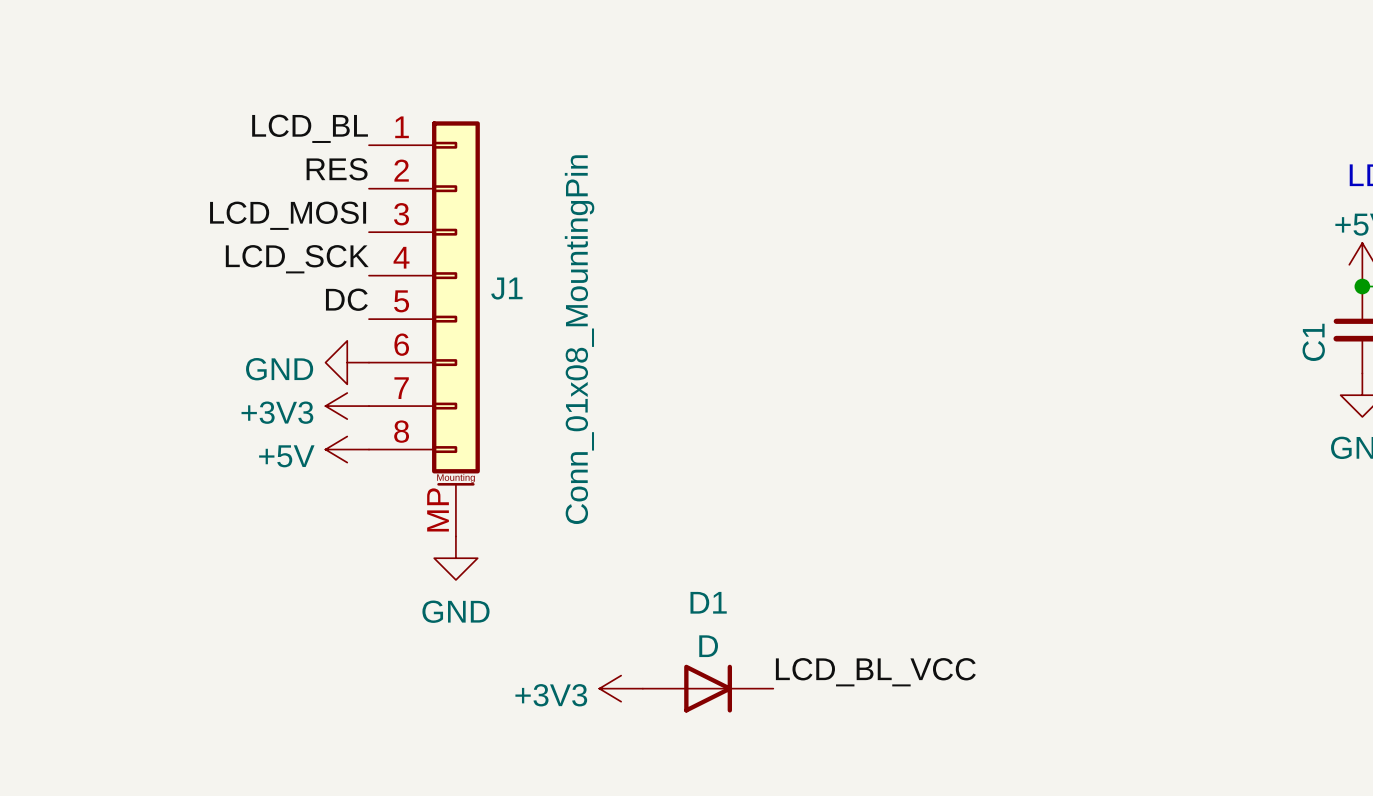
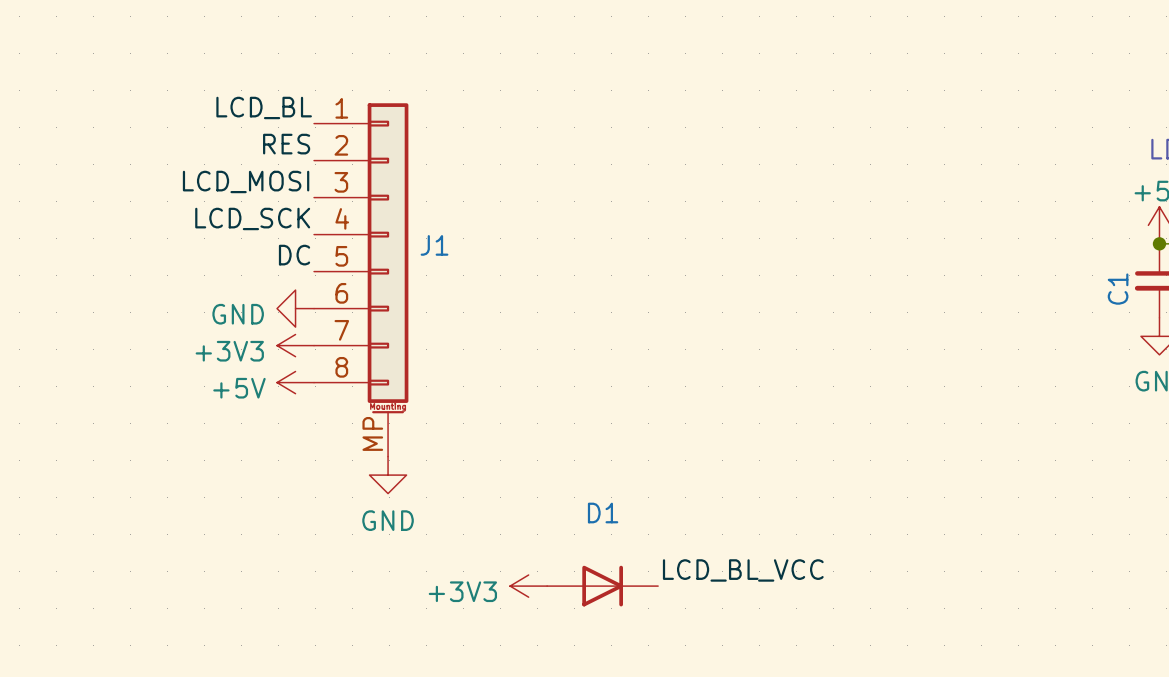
J1 value: Conn_01x08_MountingPin (579, 339) -> none
D1 value: D (708, 646) -> none

